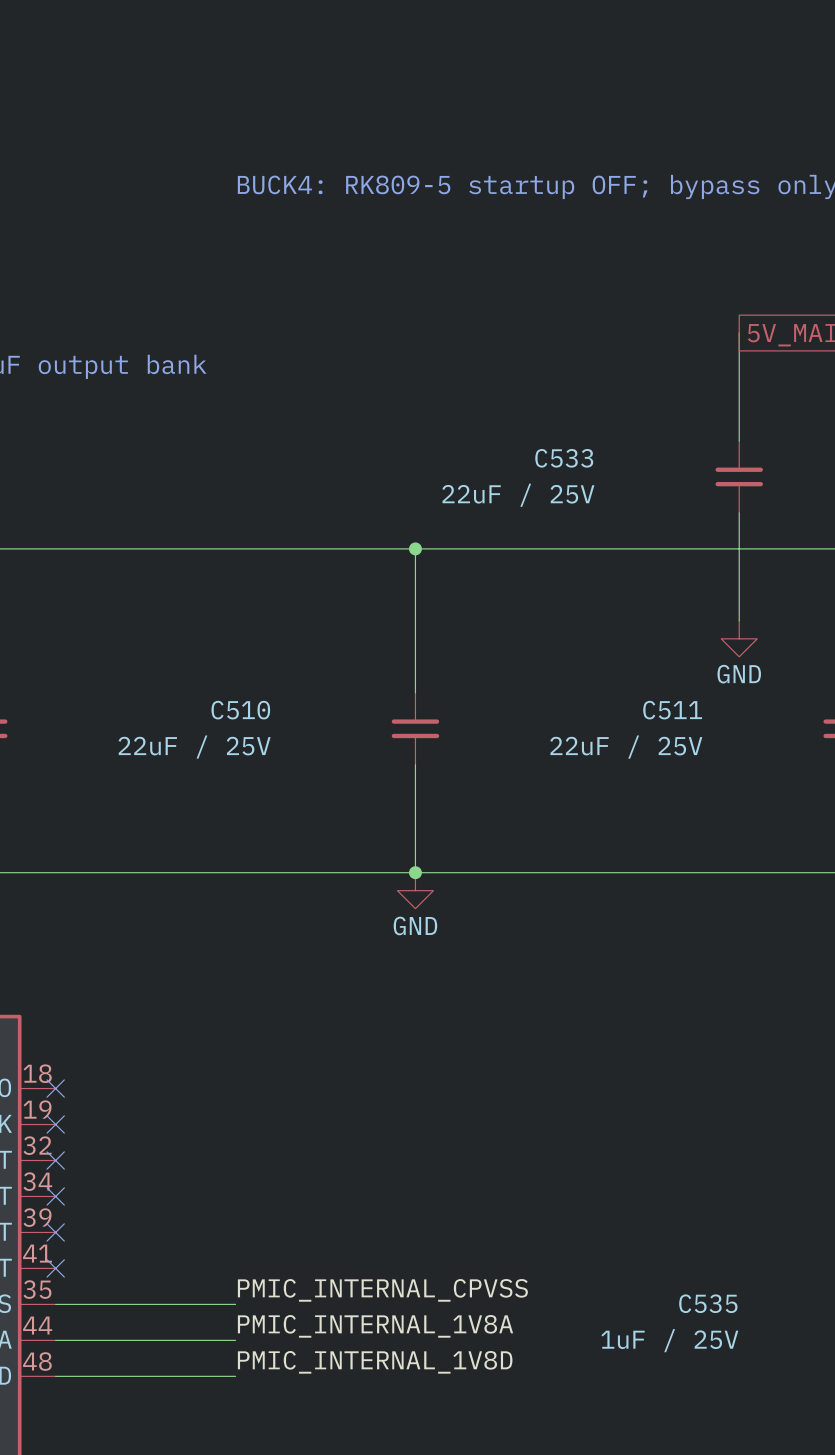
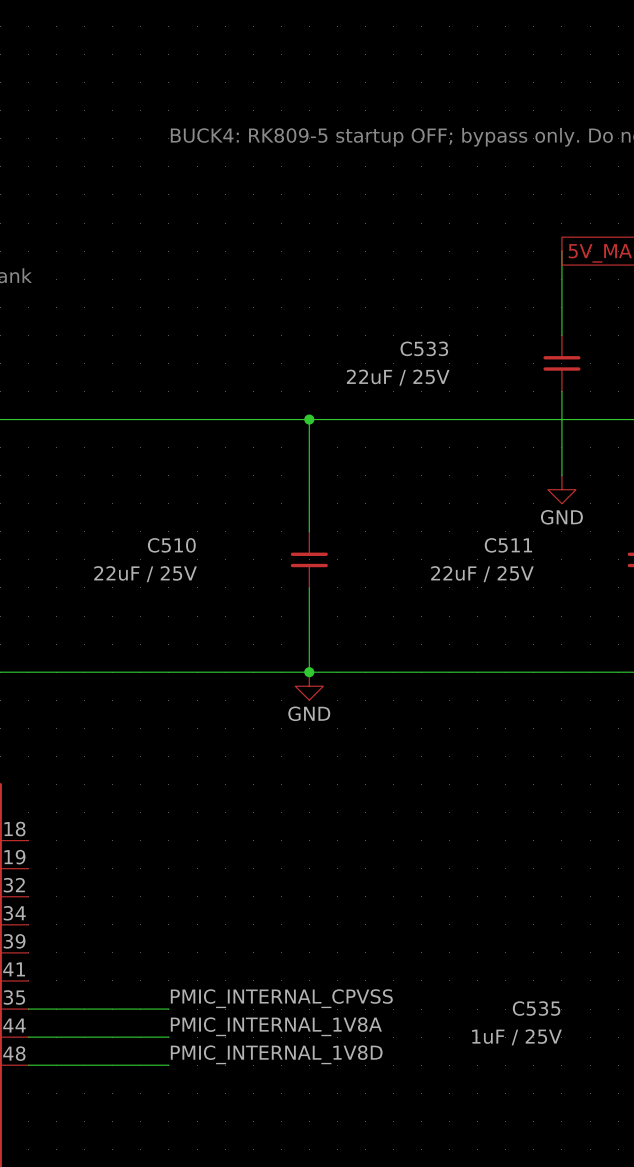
no-connect mark: (55, 1088) -> none
no-connect mark: (55, 1124) -> none
no-connect mark: (55, 1160) -> none
no-connect mark: (55, 1196) -> none
no-connect mark: (55, 1232) -> none
no-connect mark: (55, 1268) -> none

